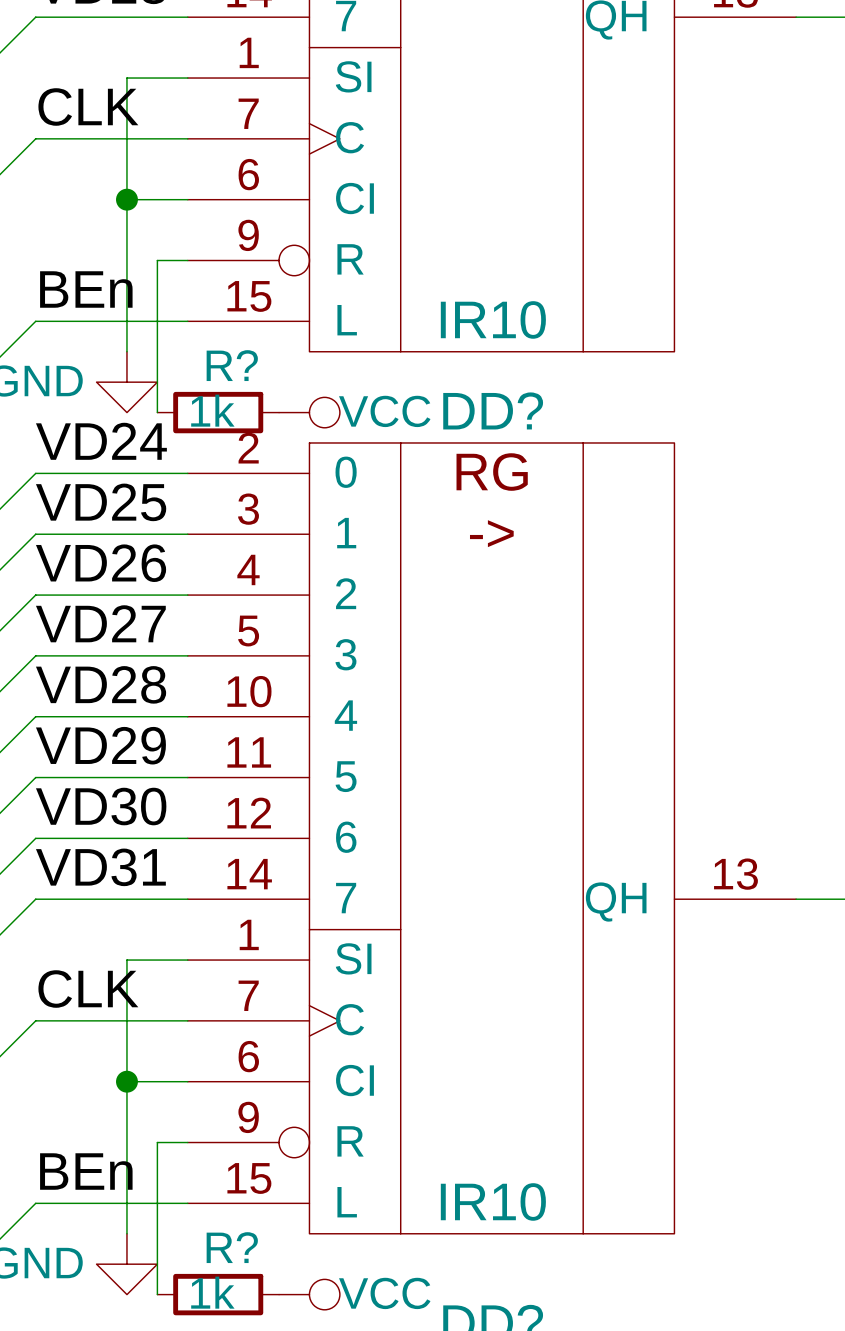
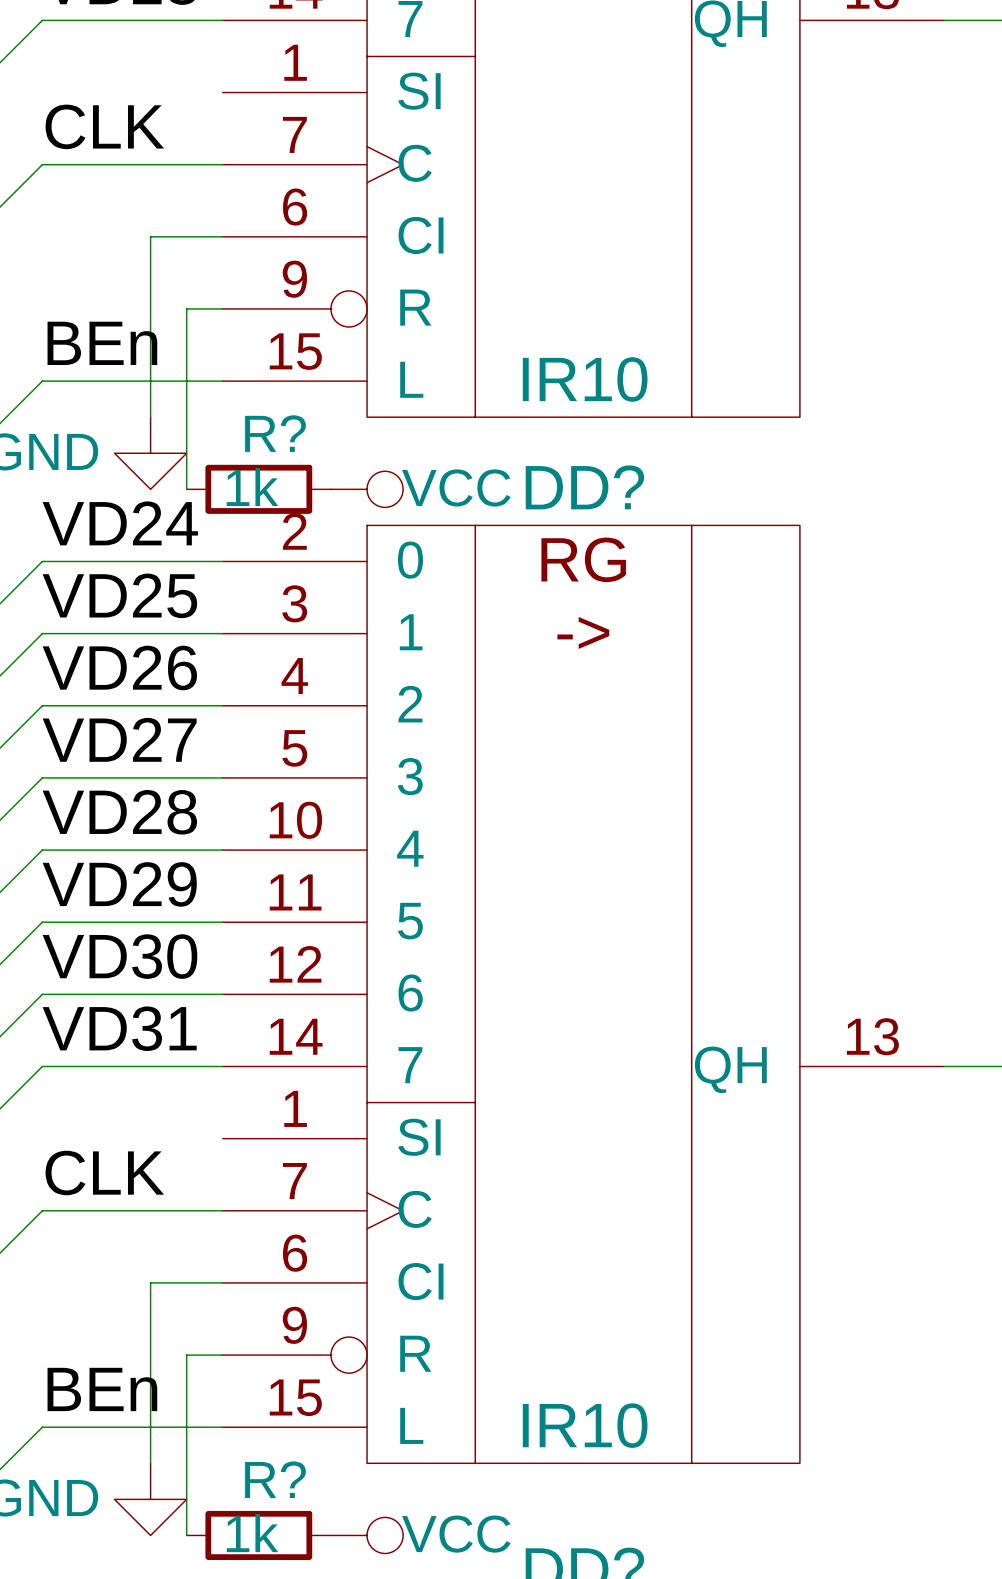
wire: (187, 78) (126, 78) (126, 199) -> none
junction: (126, 199) -> none
wire: (187, 960) (126, 960) (126, 1081) -> none
junction: (126, 1081) -> none

